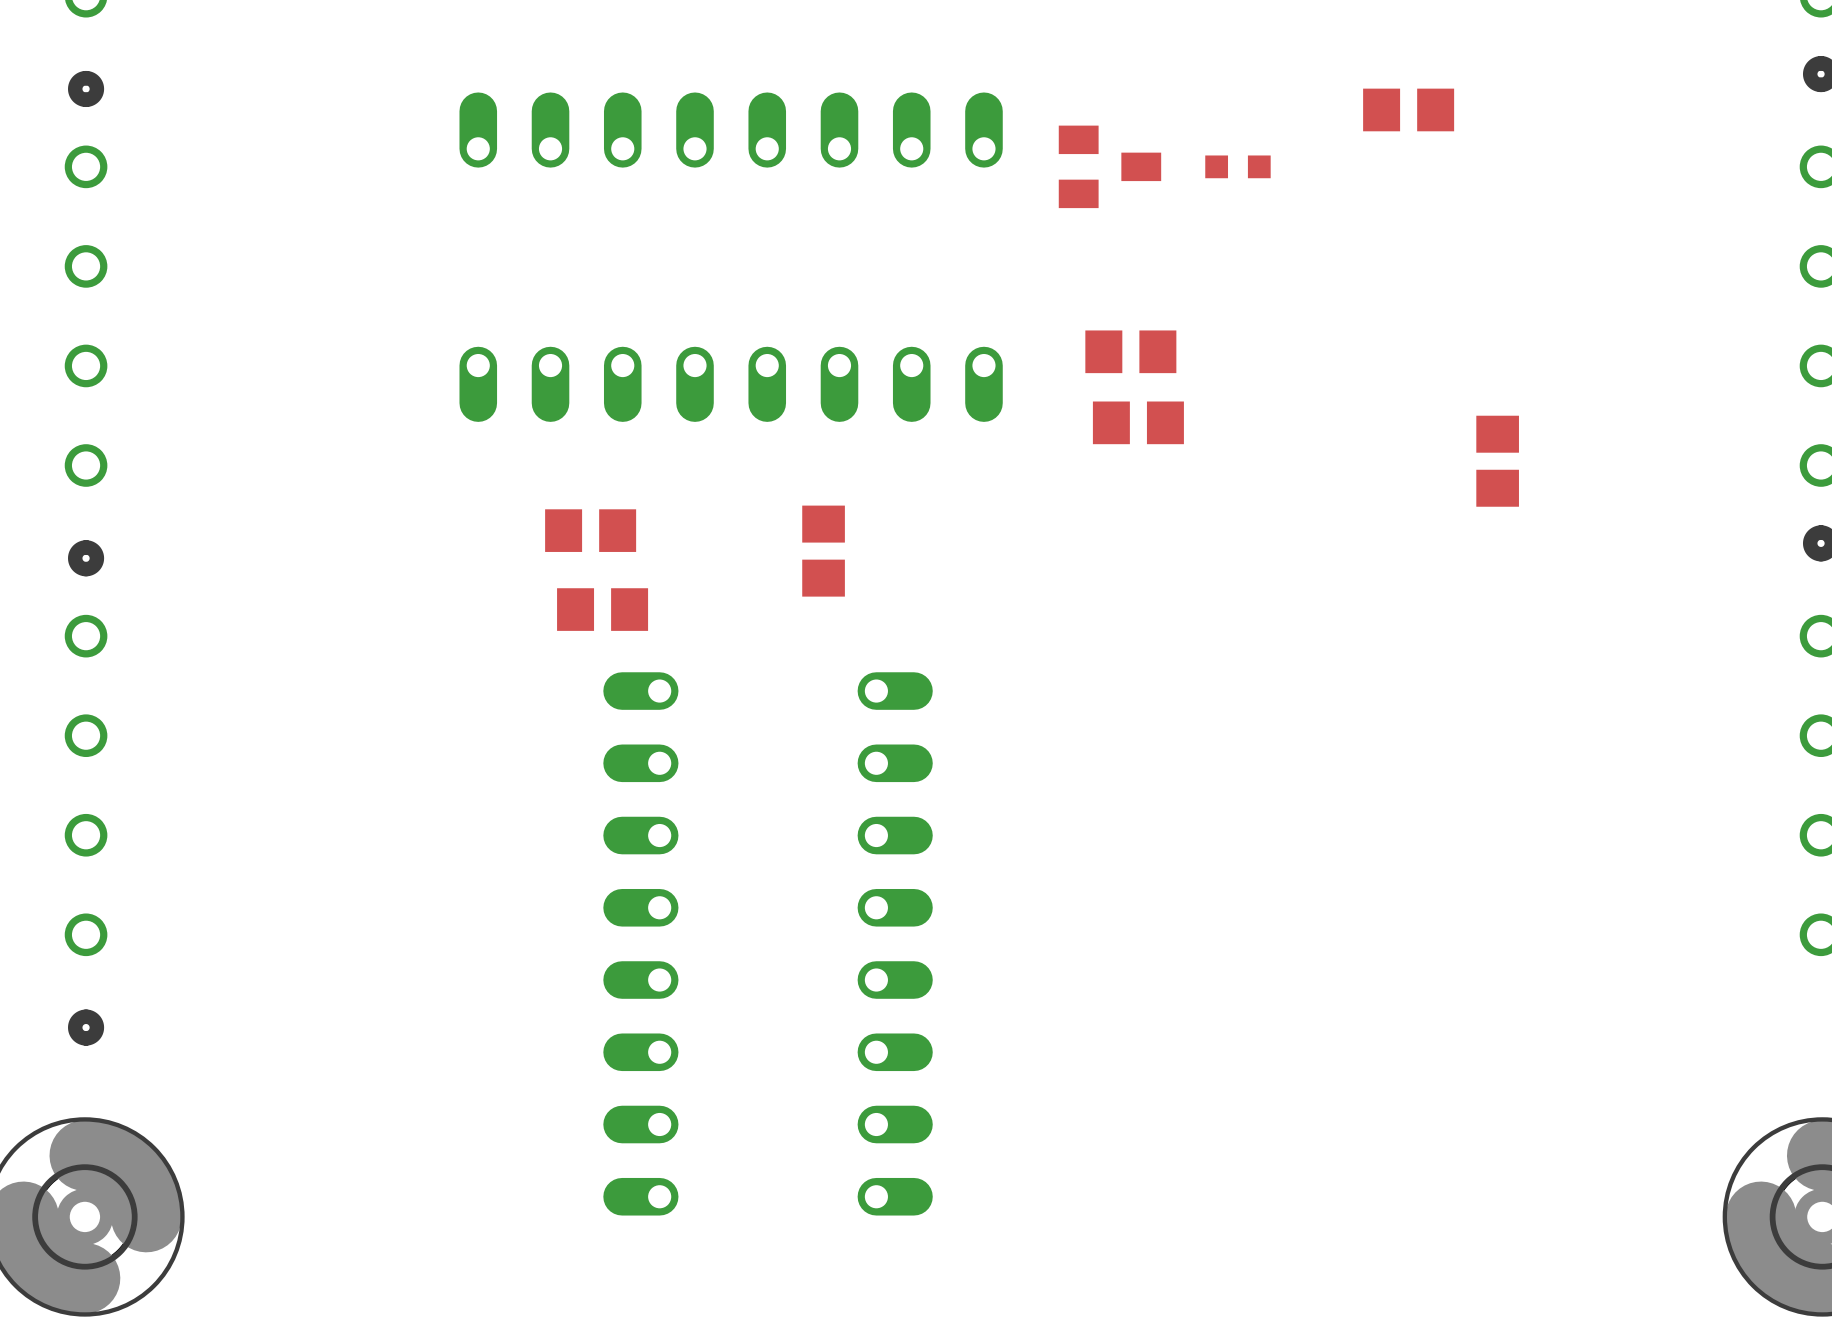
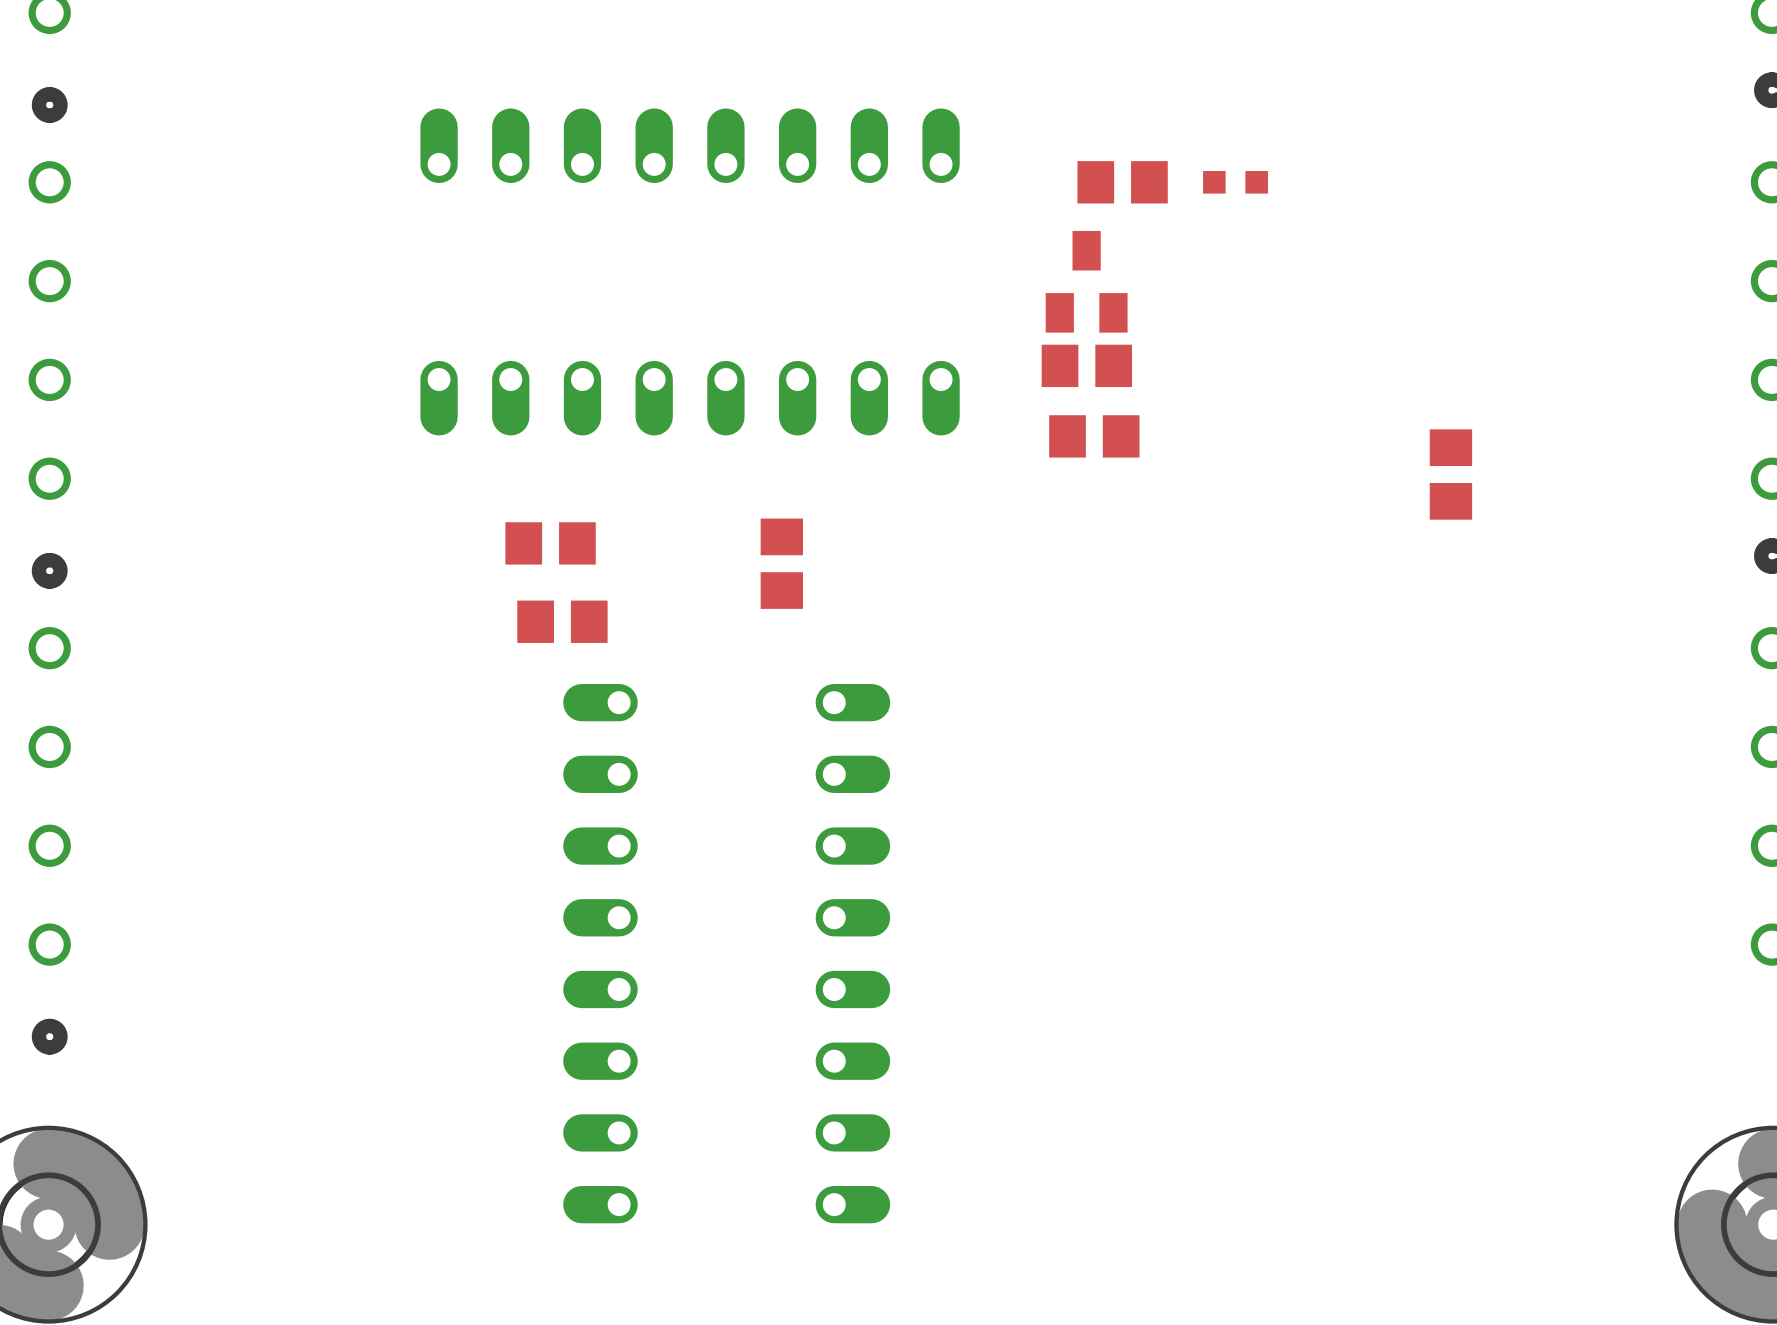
part position: (1408, 109) -> (1122, 182)
part rotation: 0° (1109, 166) -> 90° counterclockwise (1086, 281)
part position: (1109, 166) -> (1086, 281)
part position: (1237, 166) -> (1235, 182)

